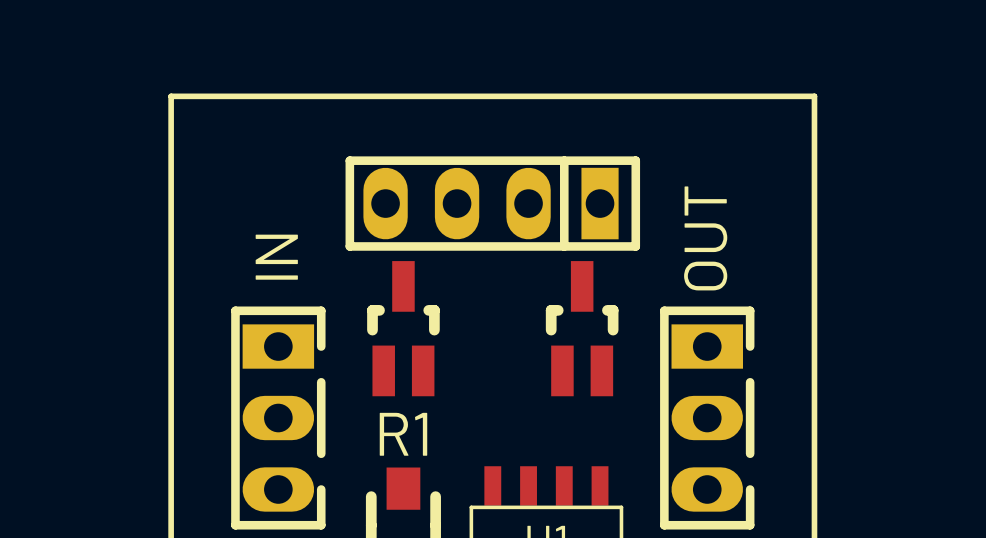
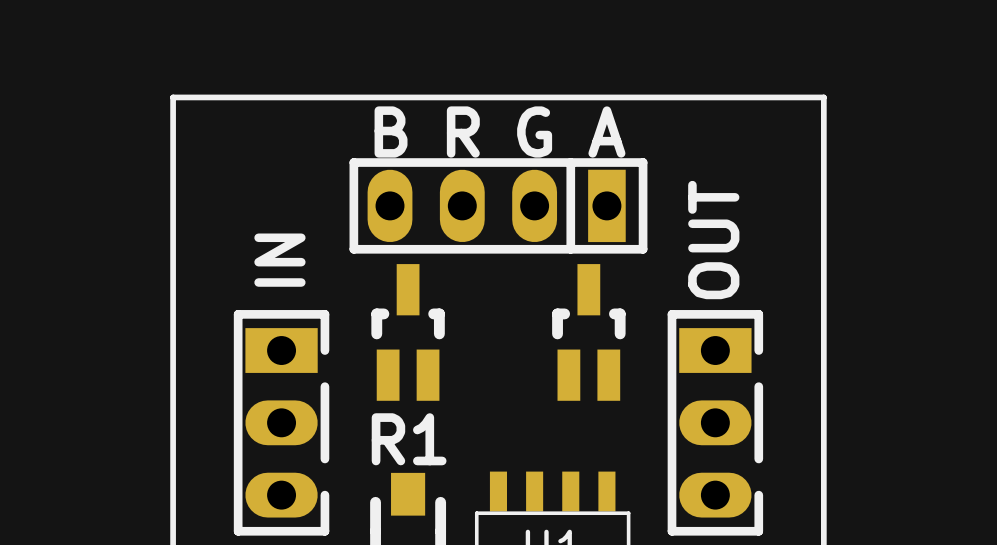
text: none -> B (391, 132)
text: none -> R (463, 132)
text: none -> G (534, 132)
text: none -> A (606, 132)

